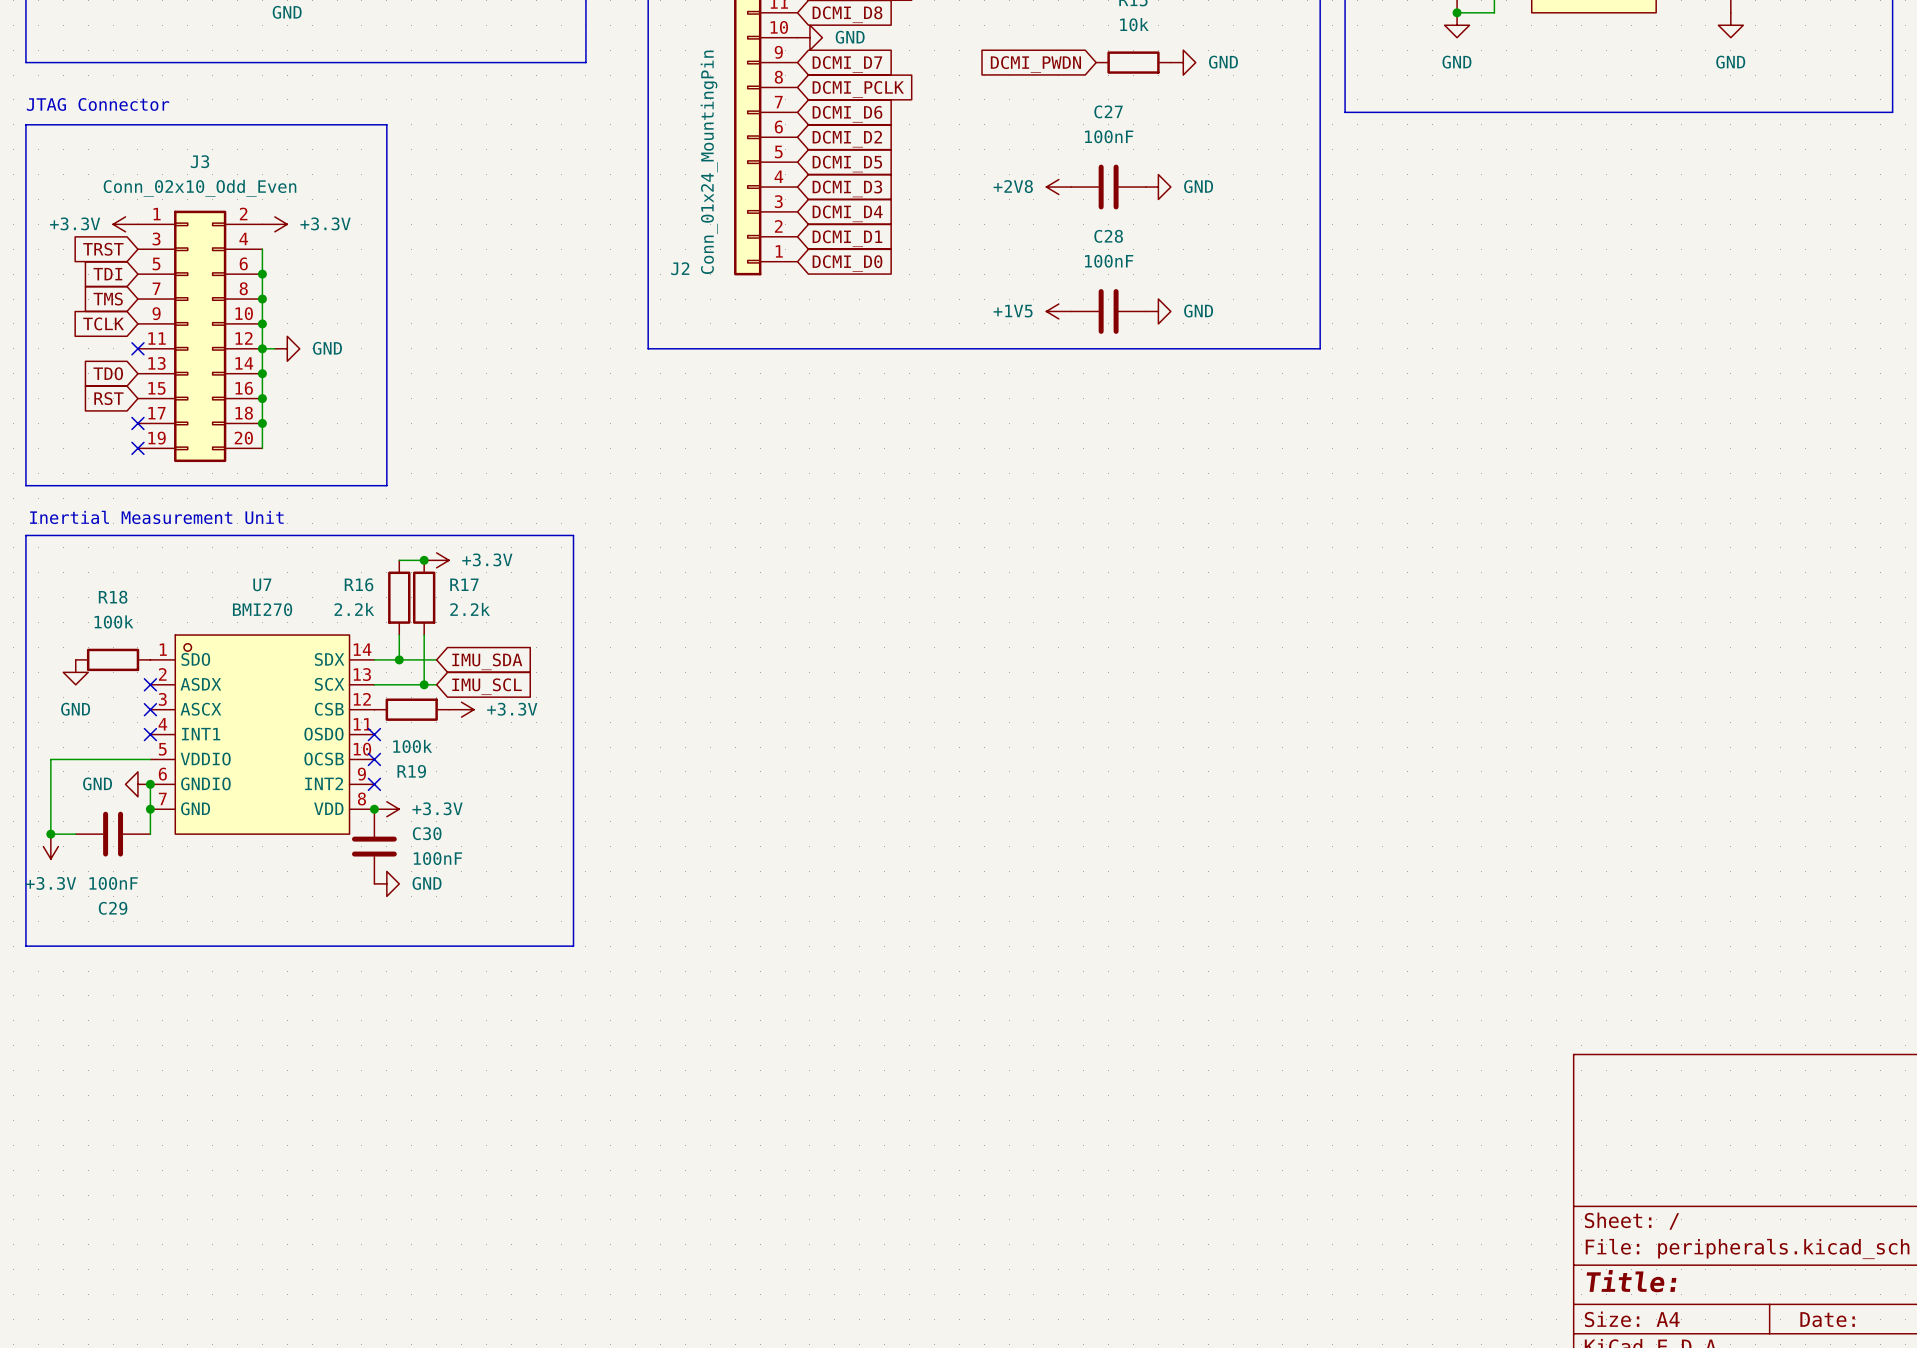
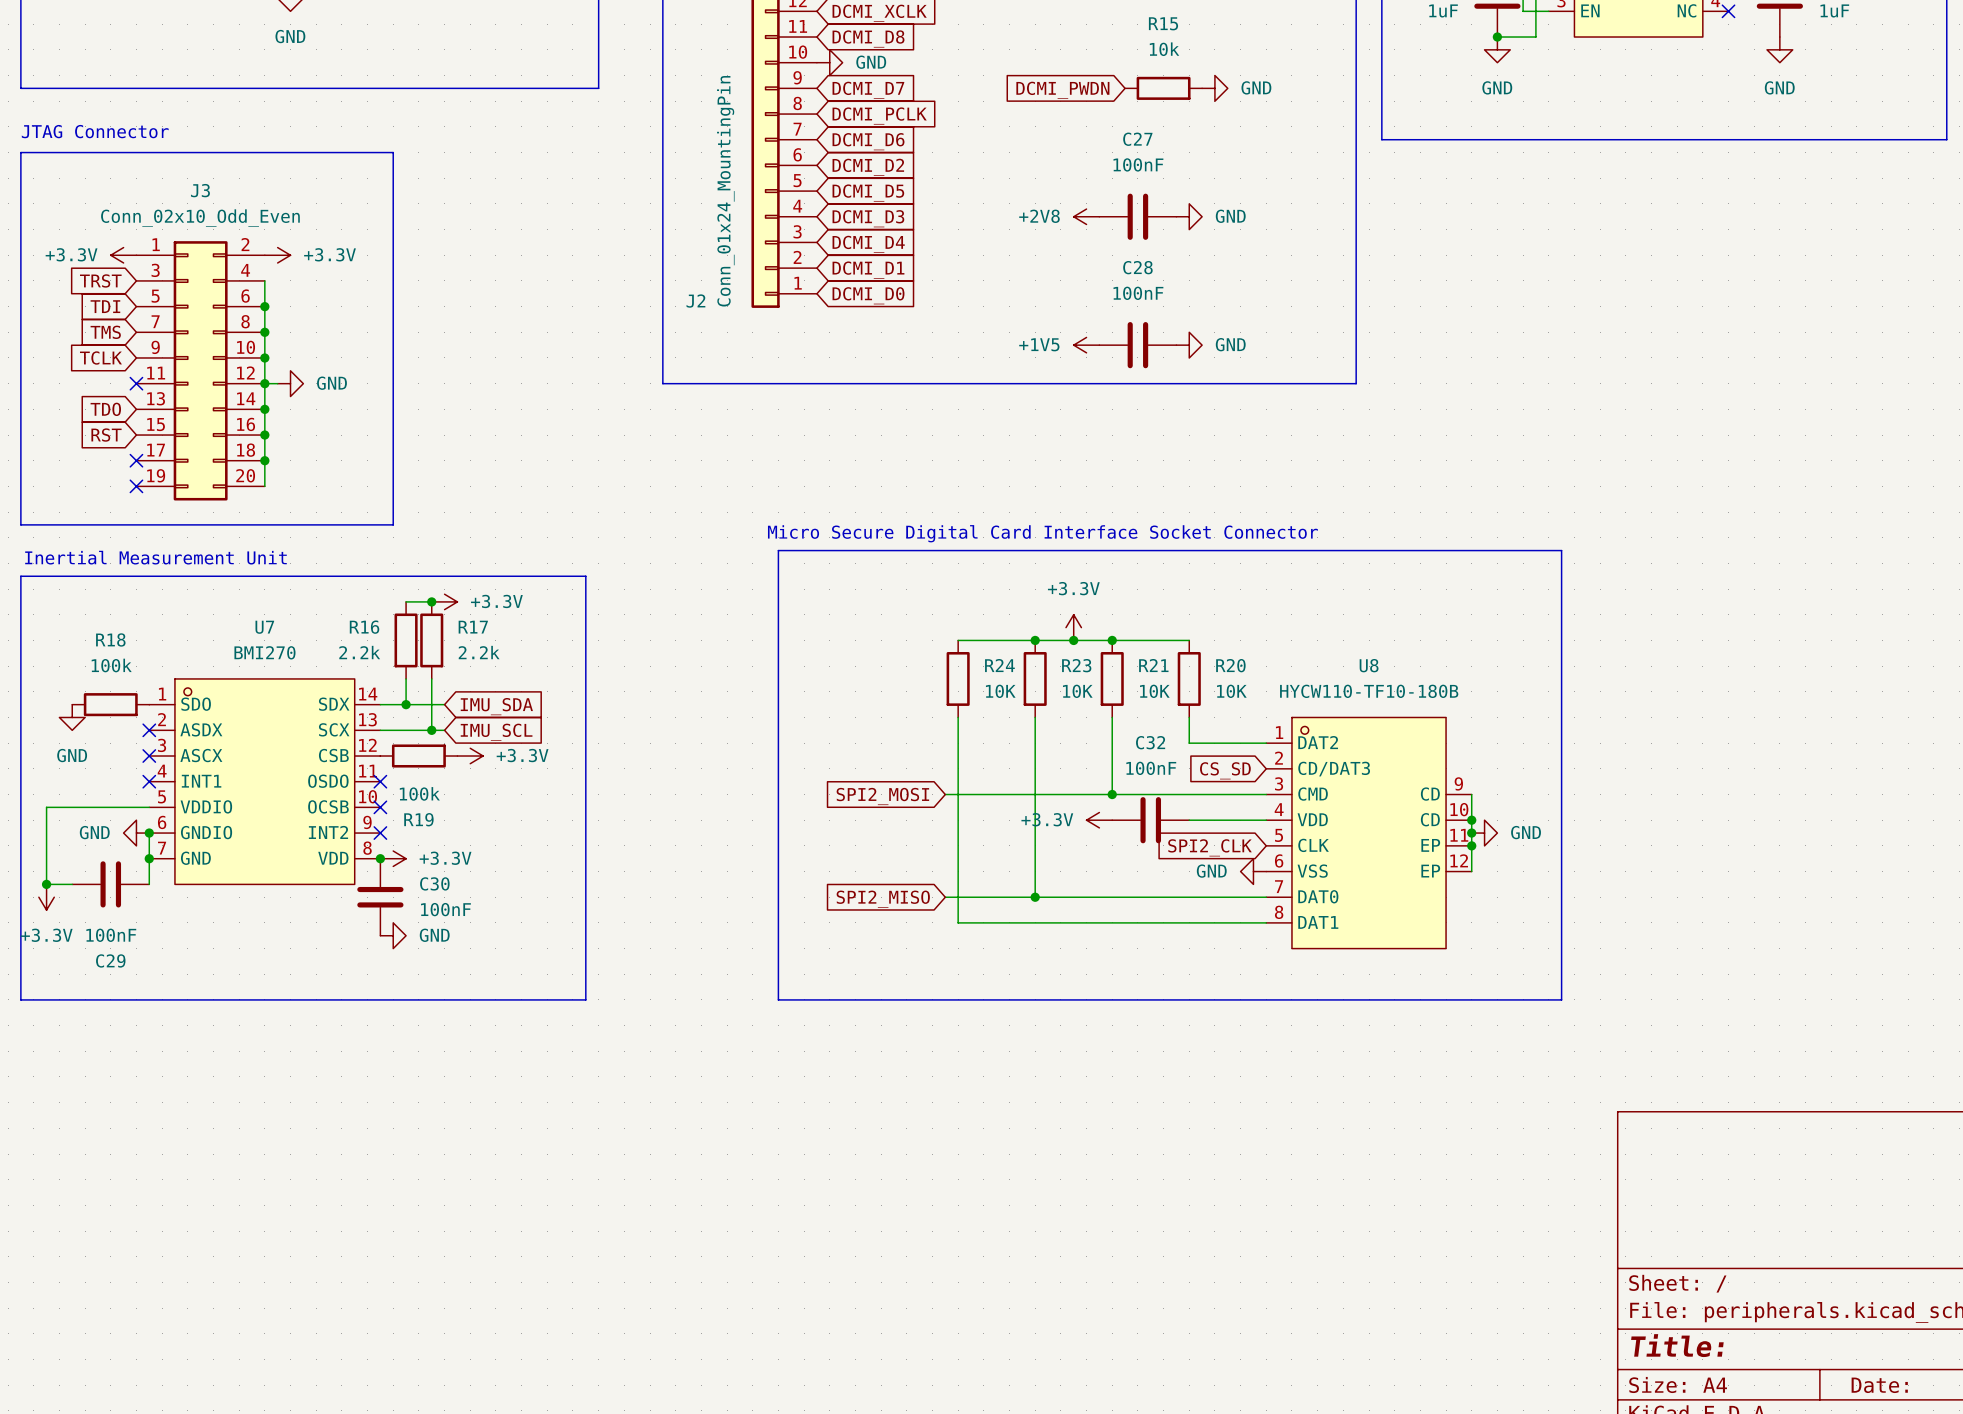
text: none -> Micro Secure Digital Card Interface Socket Connector (1042, 533)
line: none -> (778, 550) (1561, 550) (1561, 999) (778, 999) (778, 550)
power symbol: none -> +3.3V (1073, 627)
wire: none -> (958, 640) (1189, 640)
junction: none -> (1035, 640)
junction: none -> (1073, 640)
junction: none -> (1112, 640)
R24: none -> 10K (958, 678)
R23: none -> 10K (1035, 678)
R21: none -> 10K (1112, 678)
R20: none -> 10K (1189, 678)
wire: none -> (958, 717) (958, 922) (1266, 922)
wire: none -> (1035, 717) (1035, 897)
wire: none -> (1112, 717) (1112, 794)
wire: none -> (1189, 717) (1189, 743) (1266, 743)
global label: none -> CS_SD (1225, 770)
wire: none -> (945, 794) (1266, 794)
junction: none -> (1112, 794)
wire: none -> (1471, 794) (1471, 871)
global label: none -> SPI2_MOSI (882, 796)
power symbol: none -> +3.3V (1099, 820)
C32: none -> 100nF (1150, 820)
wire: none -> (1189, 820) (1266, 820)
junction: none -> (1471, 820)
U8: none -> HYCW110-TF10-180B (1369, 833)
junction: none -> (1471, 833)
power symbol: none -> GND (1484, 833)
junction: none -> (1471, 845)
global label: none -> SPI2_CLK (1210, 847)
power symbol: none -> GND (1253, 871)
wire: none -> (945, 897) (1266, 897)
junction: none -> (1035, 897)
global label: none -> SPI2_MISO (883, 899)

